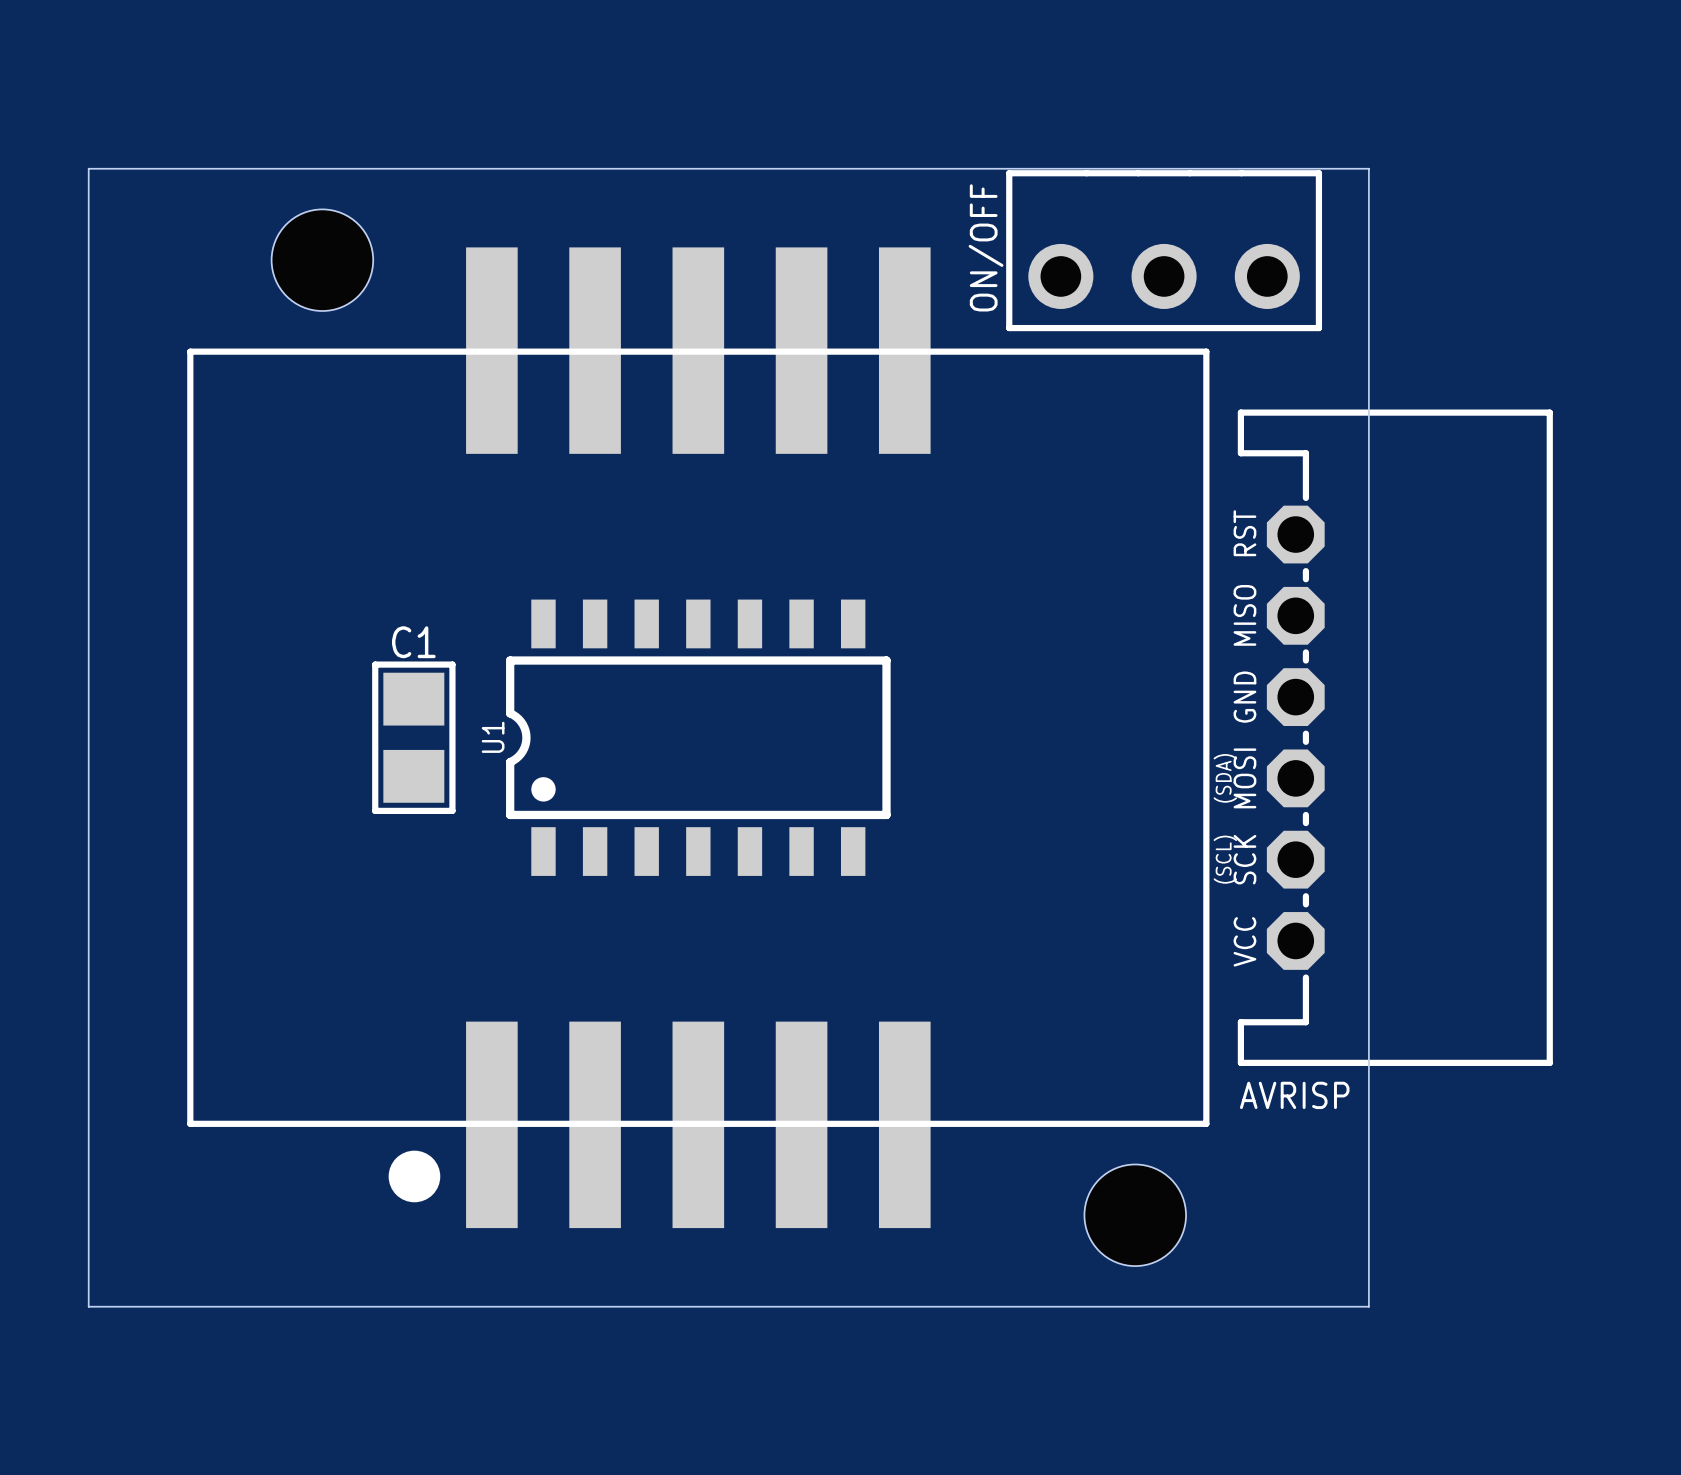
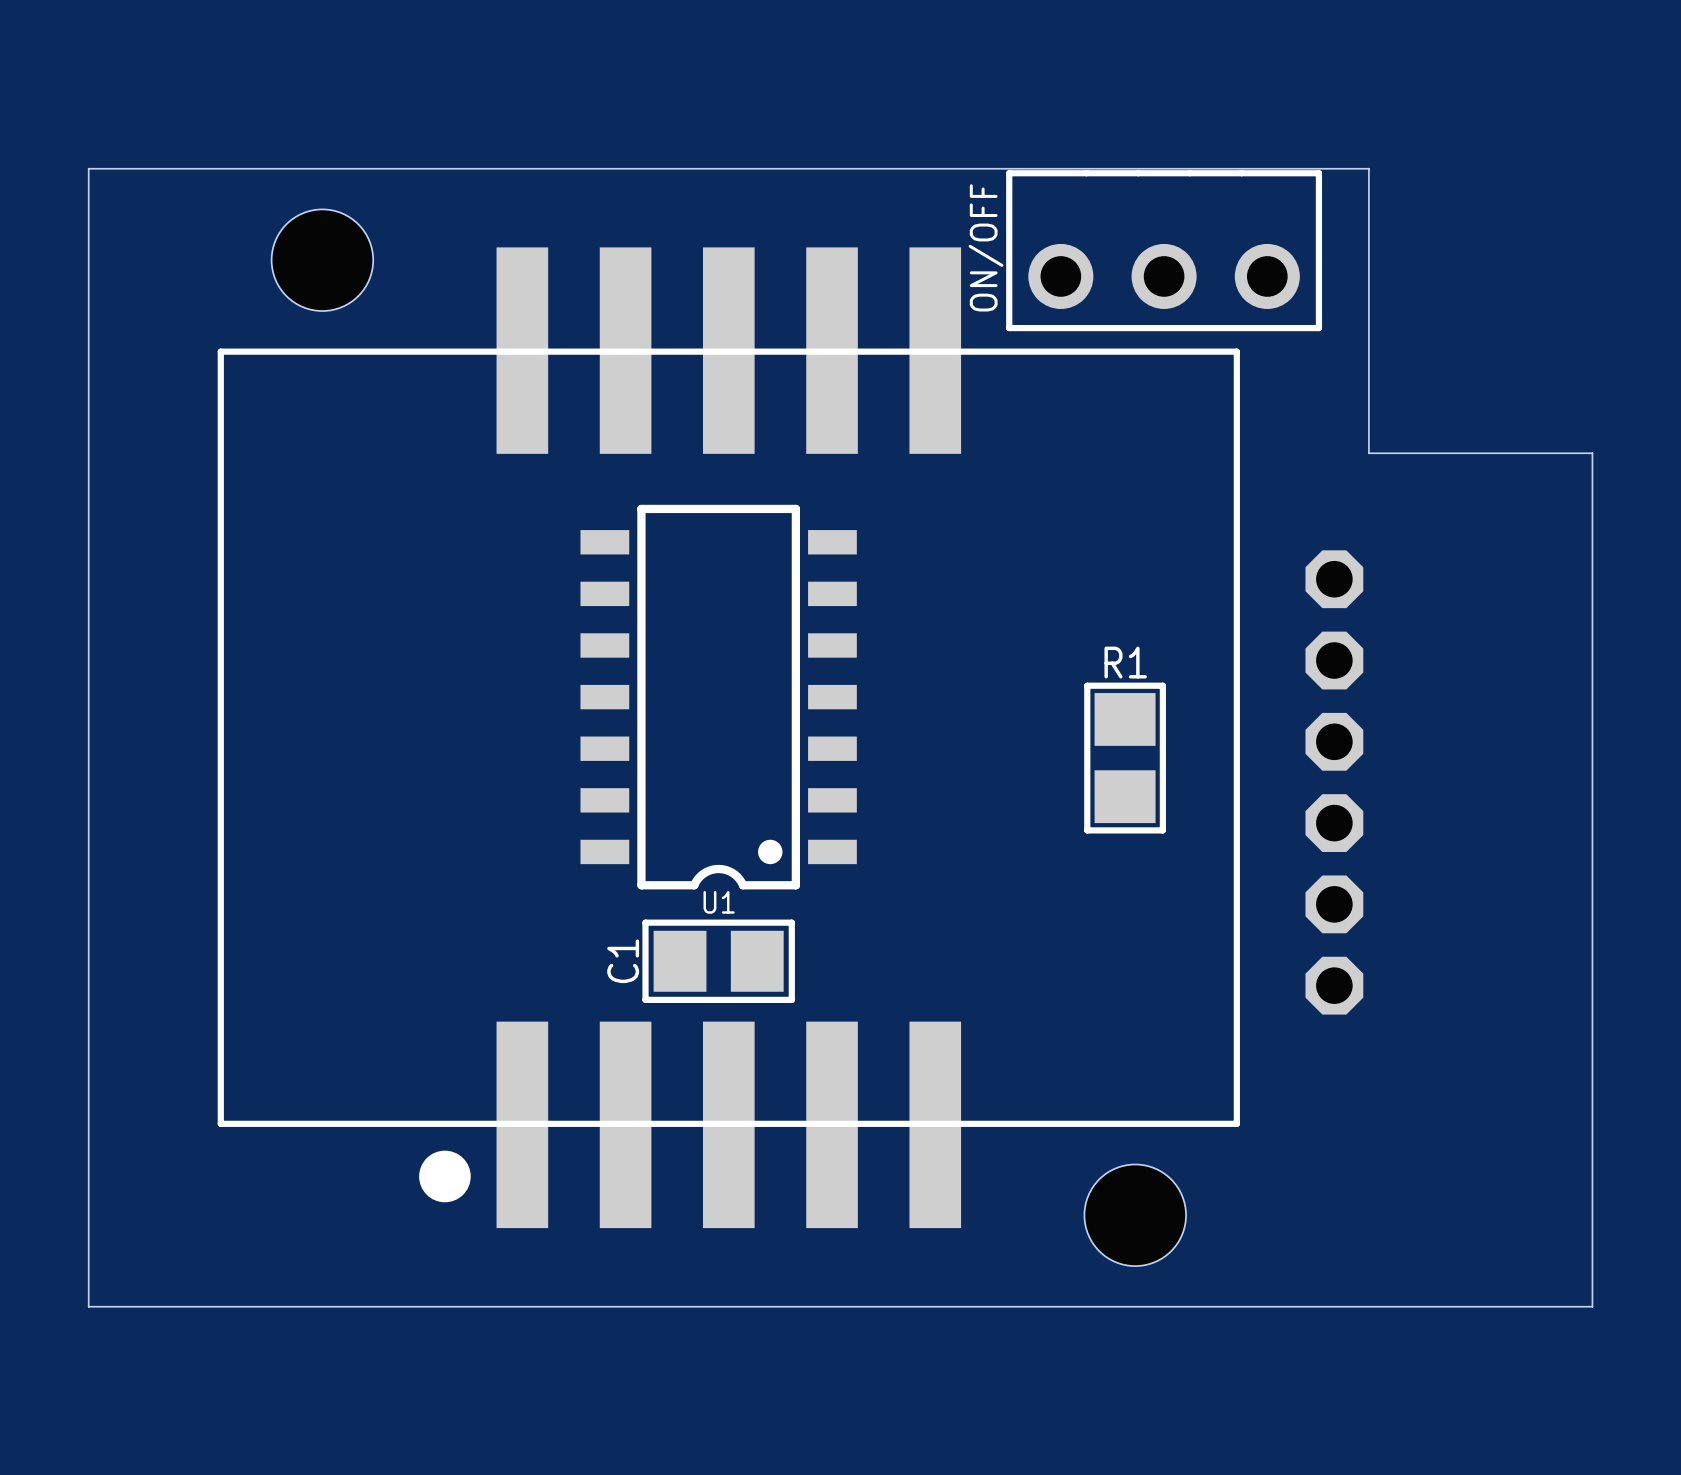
board edge: (1368, 453) (1368, 1306) -> (1368, 453) (1592, 453) (1592, 1306) (1368, 1306)
C1 name position: C1 (413, 642) -> C1 (623, 961)
C1 rotation: 0° (413, 737) -> 90° clockwise (718, 961)
C1 position: (413, 737) -> (718, 961)
U1 rotation: 0° (698, 737) -> 90° counterclockwise (718, 697)
part position: (698, 737) -> (728, 737)
AVRISP side: top (1395, 737) -> bottom (1334, 782)
R1: none -> (1125, 758)

